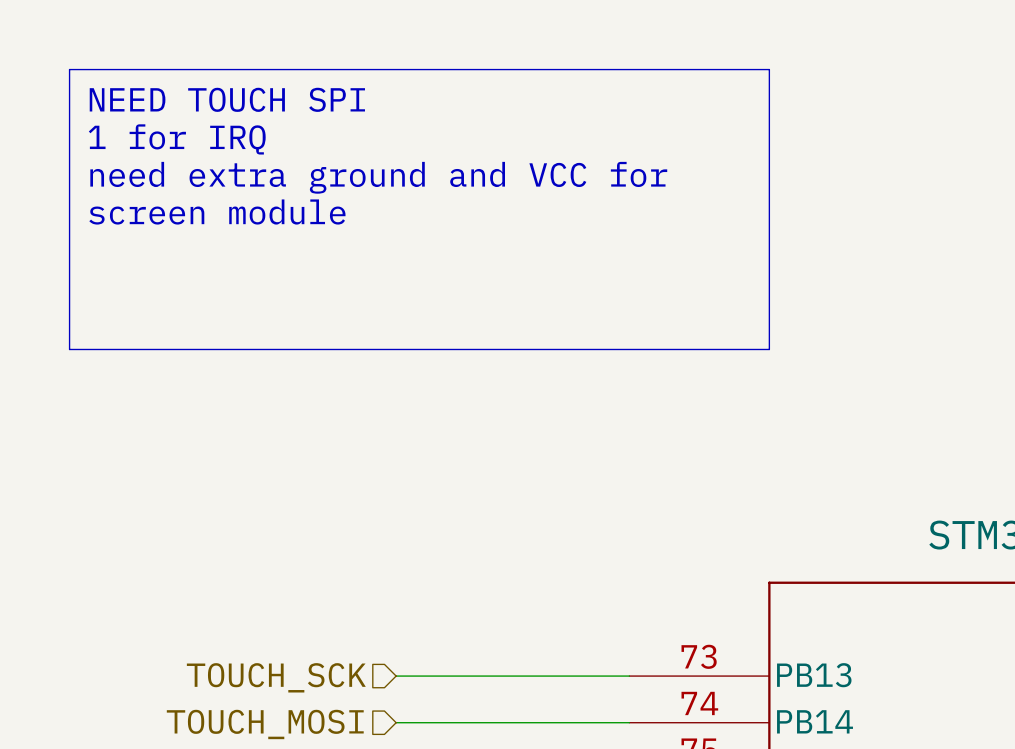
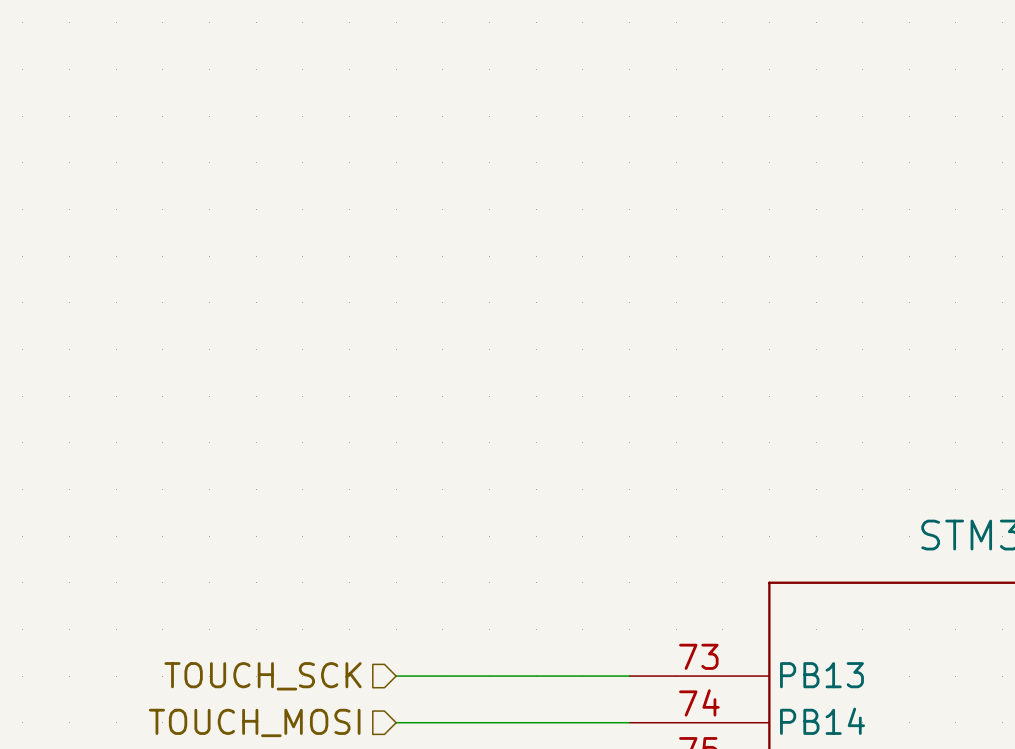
line: (69, 69) (769, 69) (769, 349) (69, 349) (69, 69) -> none
text: NEED TOUCH SPI (227, 99) -> none
text: 1 for IRQ (177, 139) -> none
text: need extra ground and VCC for (378, 177) -> none
text: screen module (217, 212) -> none

